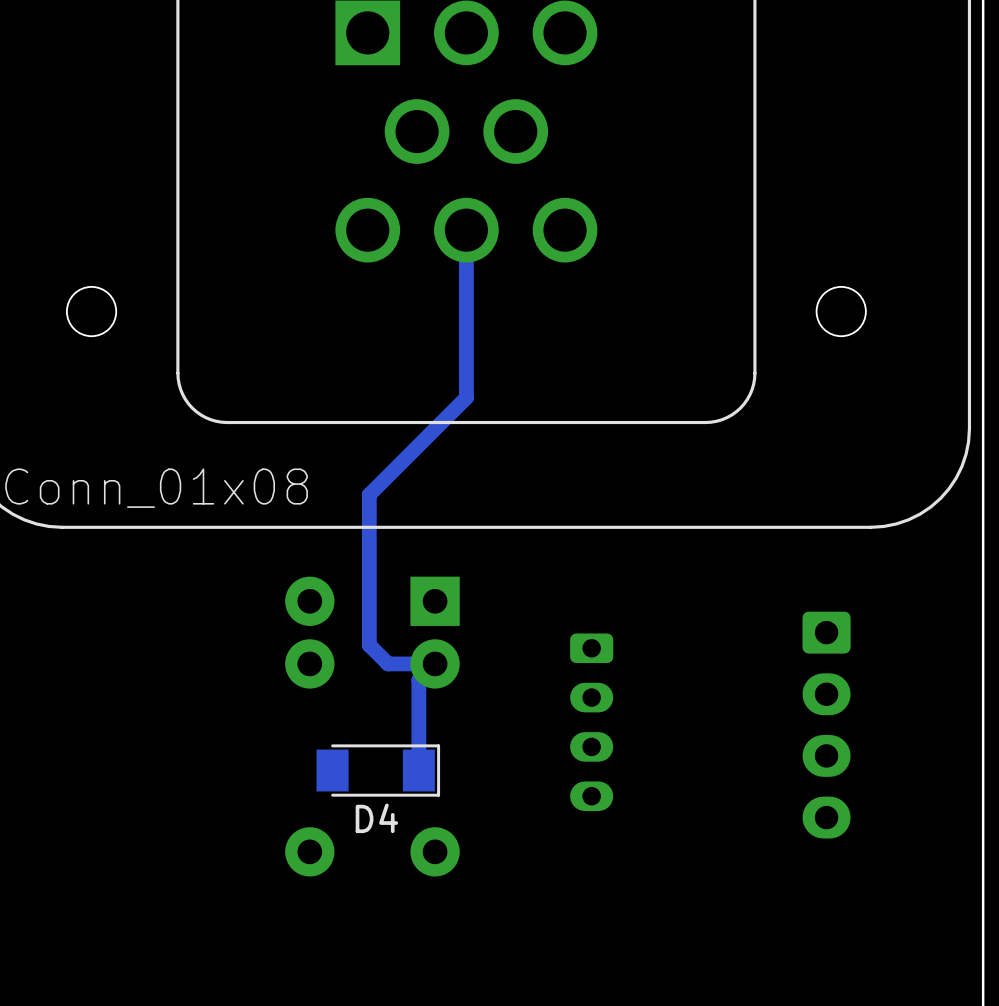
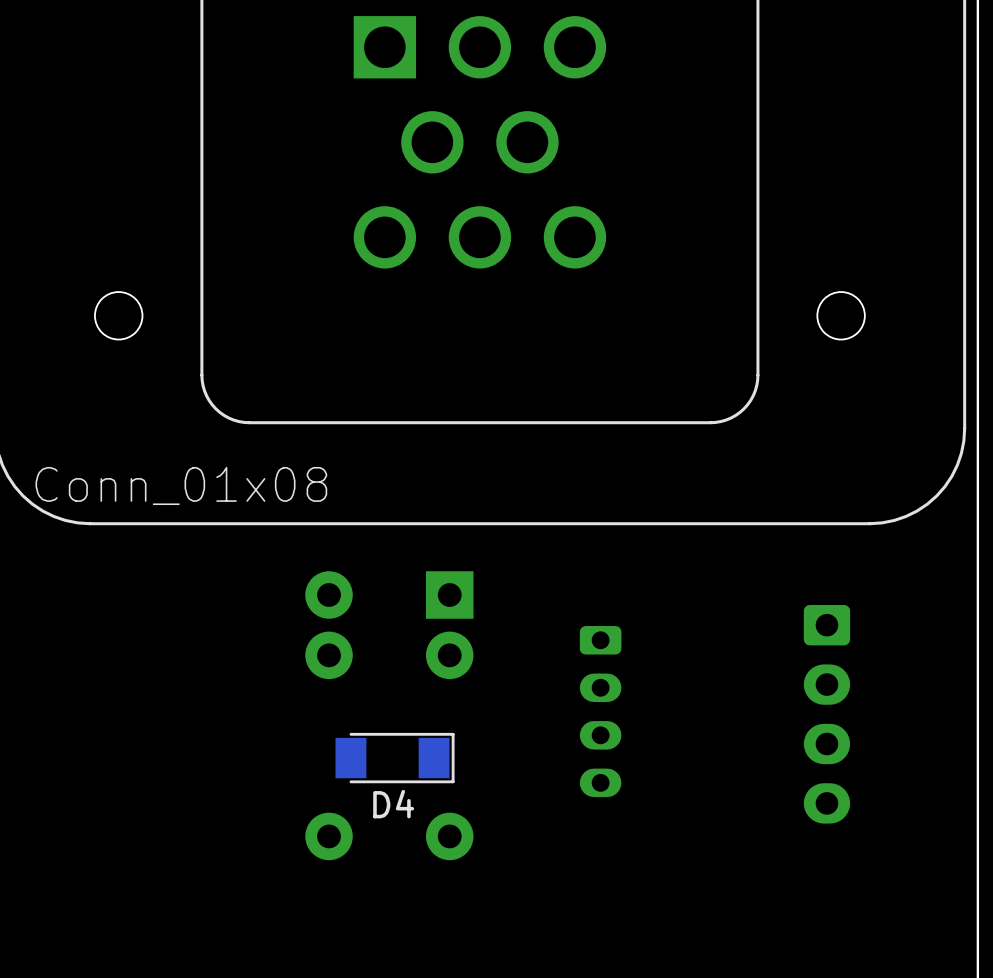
track: (466, 230) (466, 397) (369, 494) (369, 645) (388, 663) (435, 663) (418, 680) (418, 770) -> none

